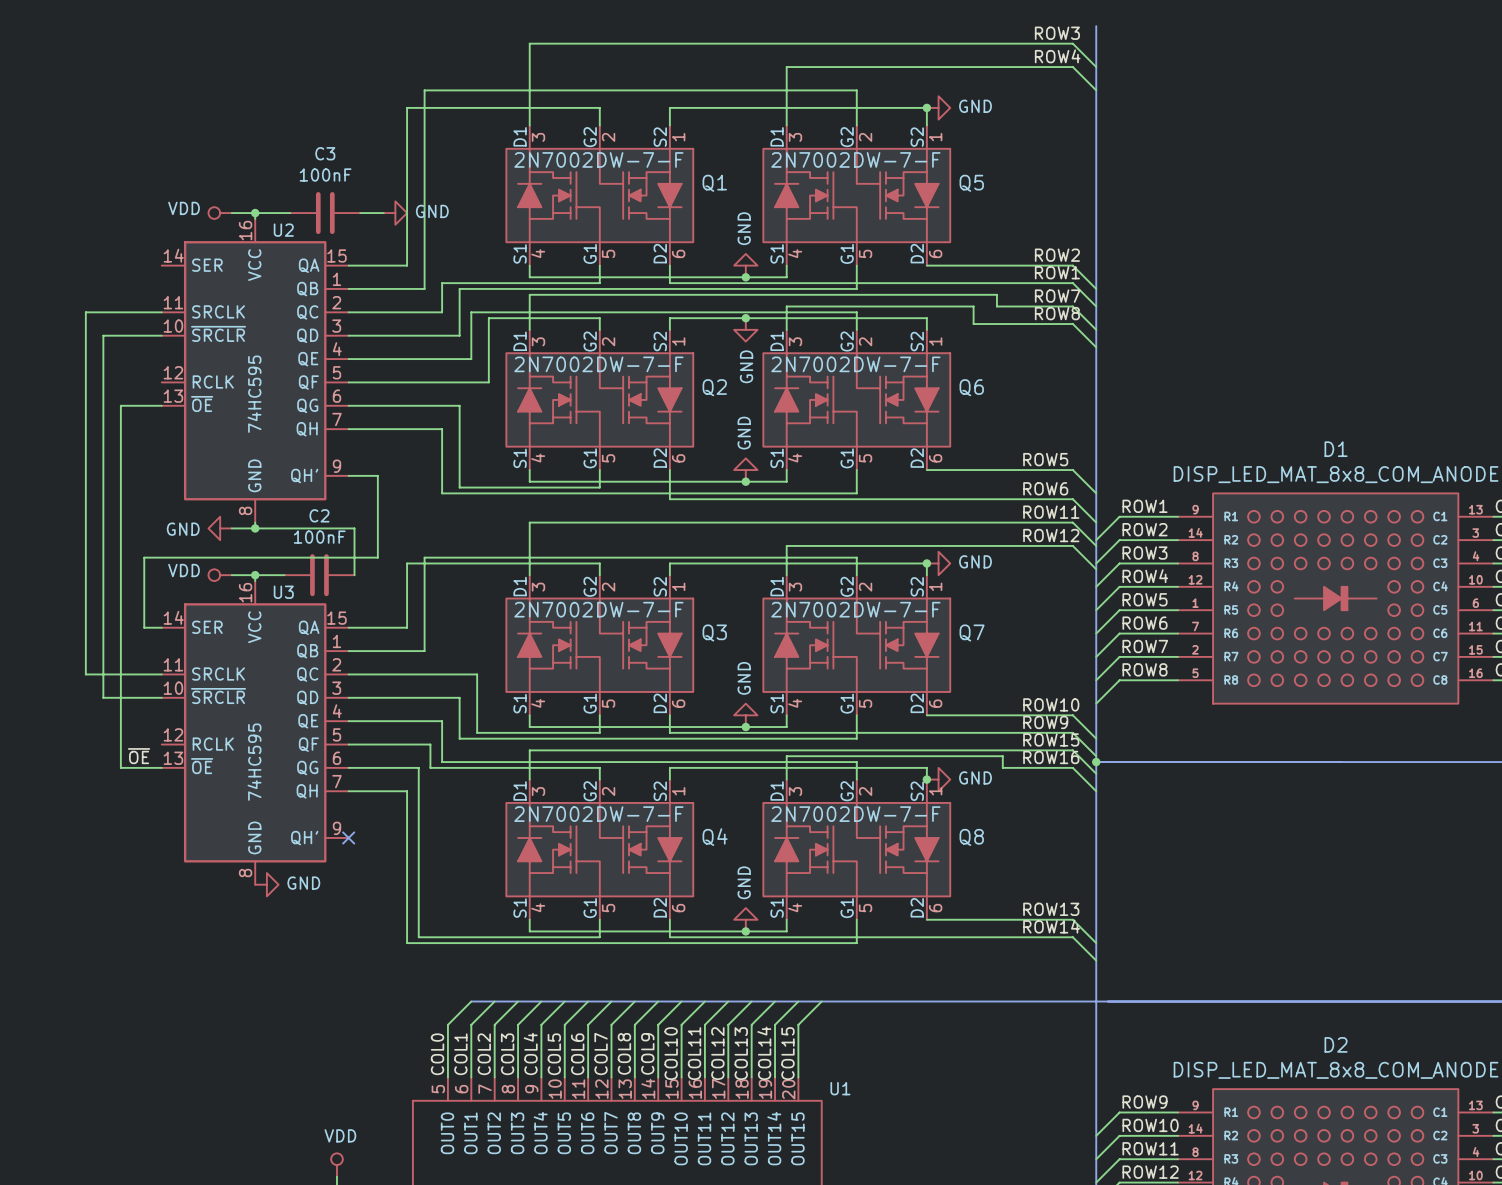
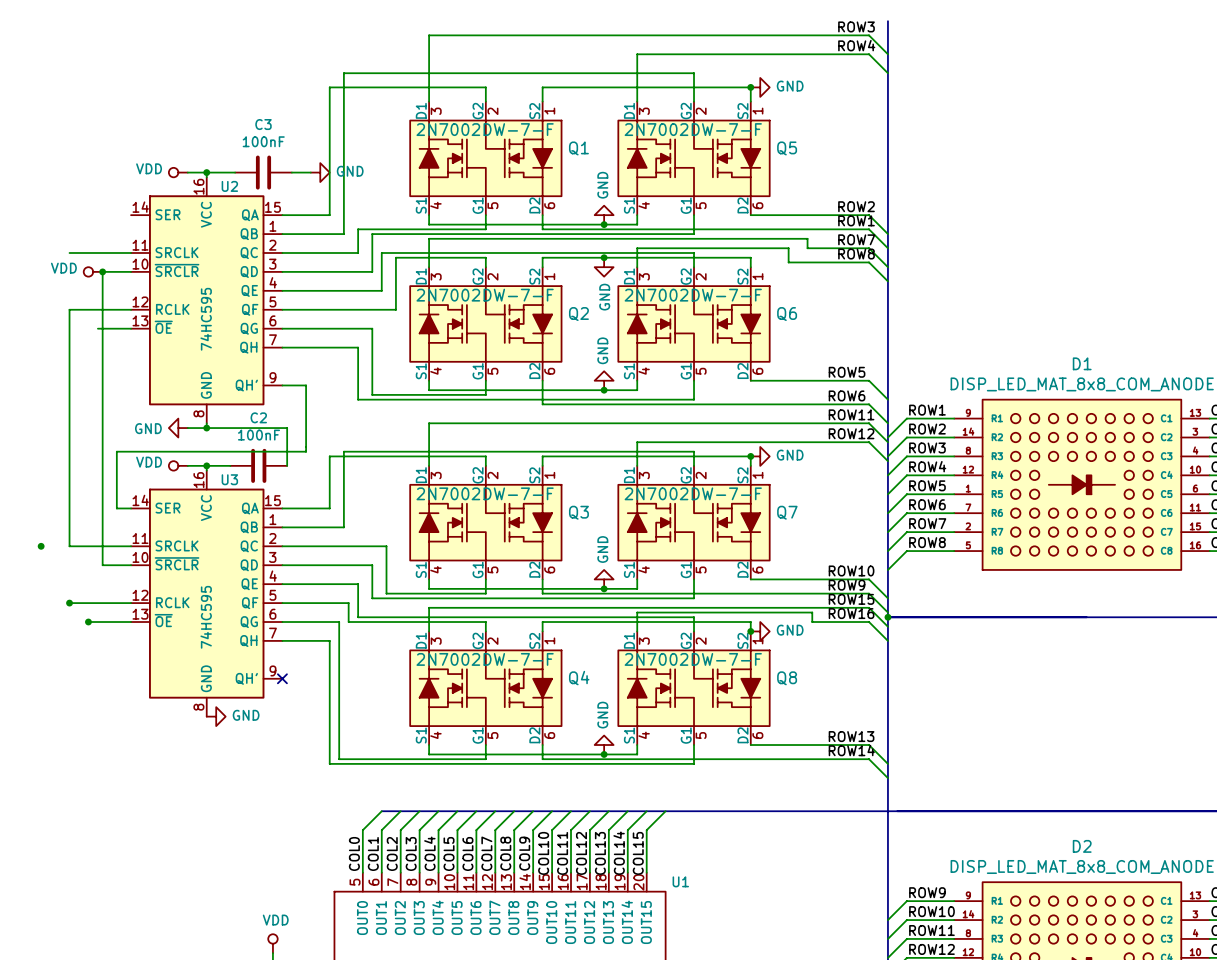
wire: (85, 312) (85, 382) -> (131, 309) (69, 309)
power symbol: none -> VDD (93, 271)
wire: (126, 335) (103, 335) (103, 697) (126, 697) -> (102, 271) (102, 565)
junction: none -> (102, 271)
wire: (120, 405) (120, 767) -> (88, 622) (97, 622)
junction: none -> (41, 546)
wire: none -> (69, 603) (131, 603)
junction: none -> (69, 603)
label: ~{OE} (139, 756) -> none
junction: none -> (88, 622)

